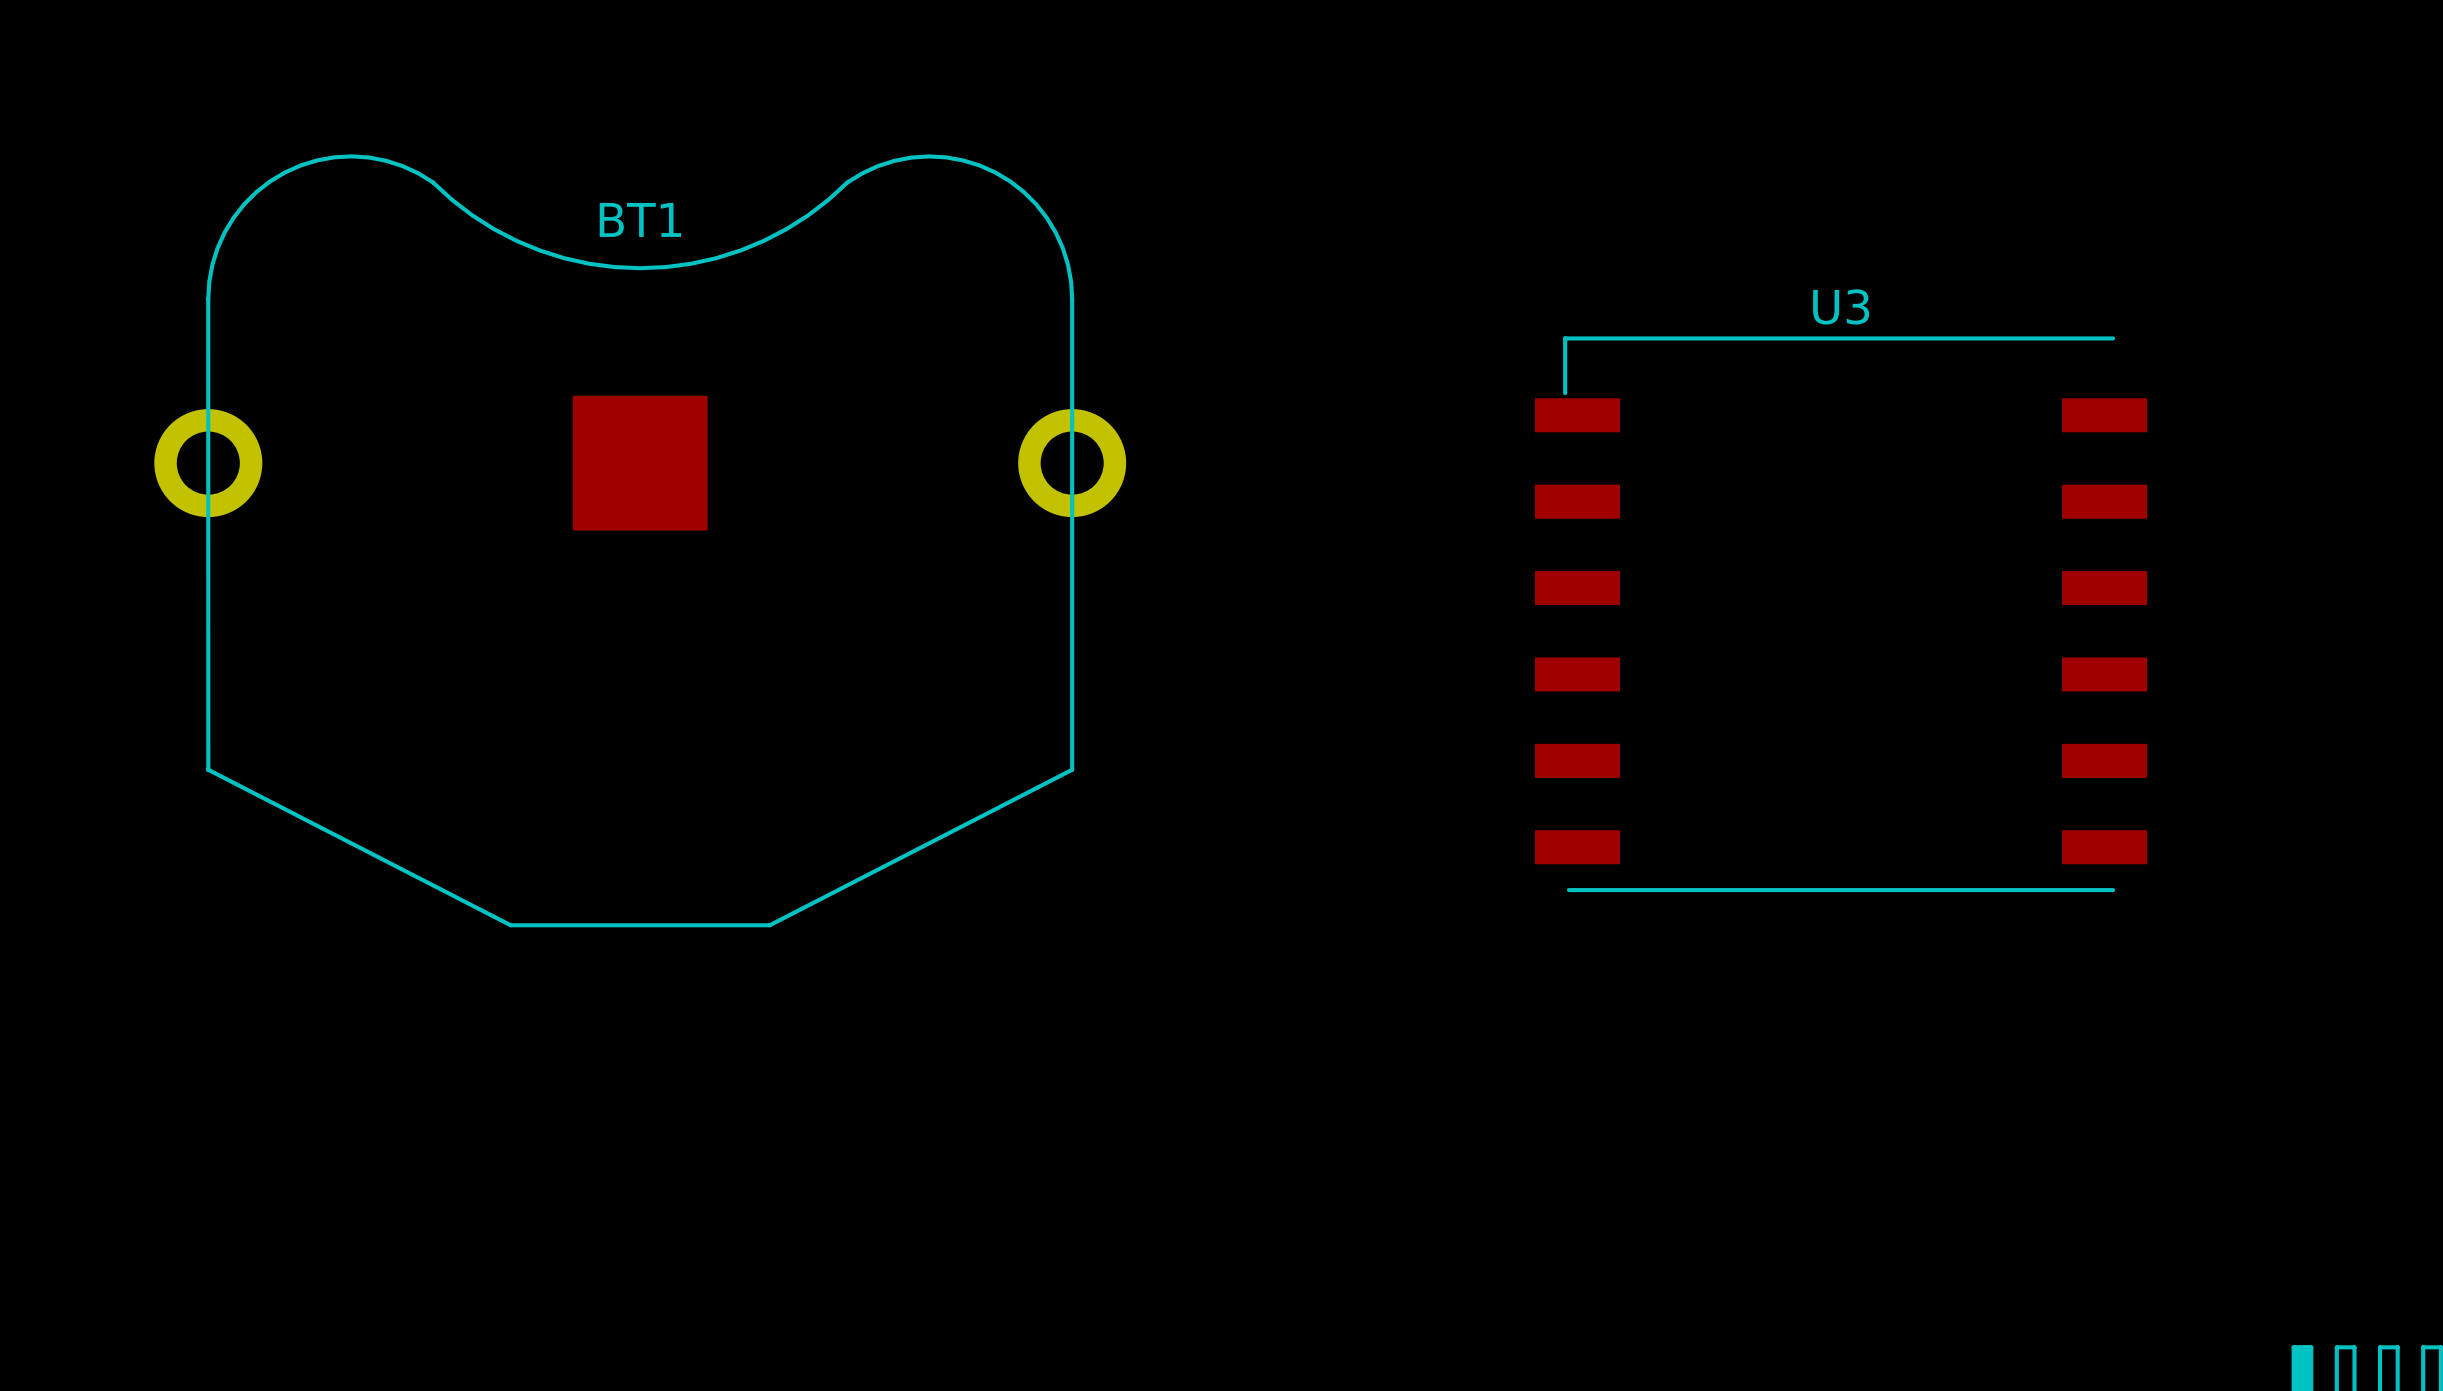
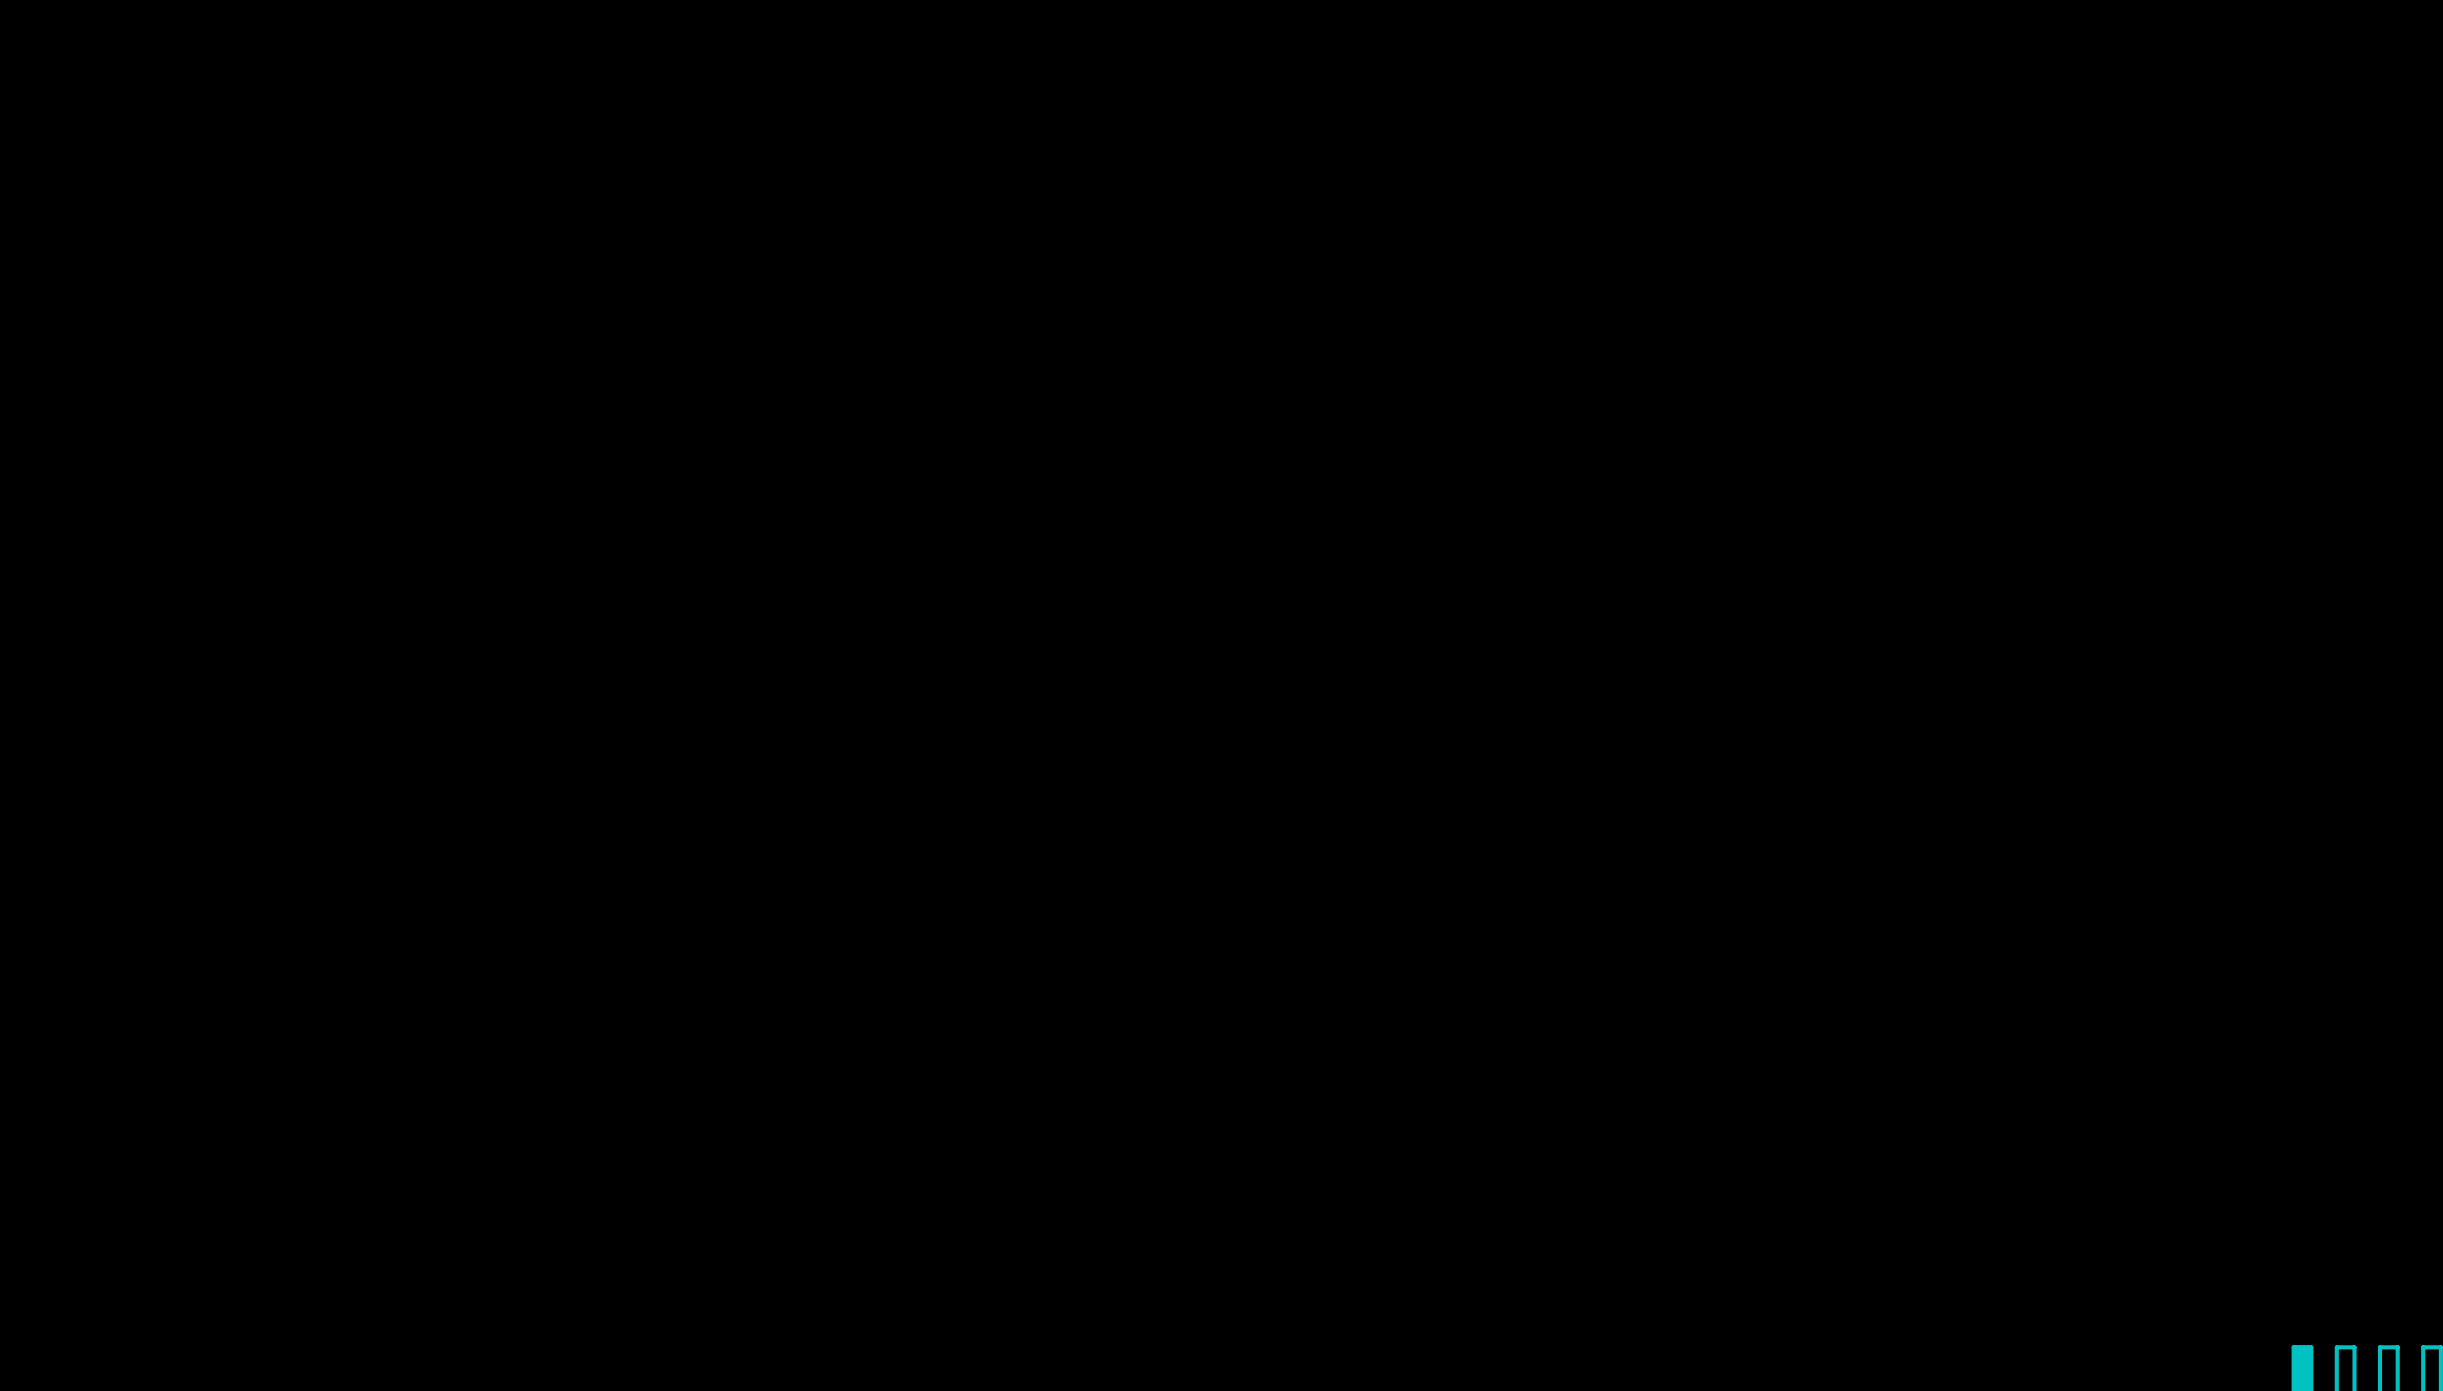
BT1: (640, 540) -> none
U3: (1841, 614) -> none

